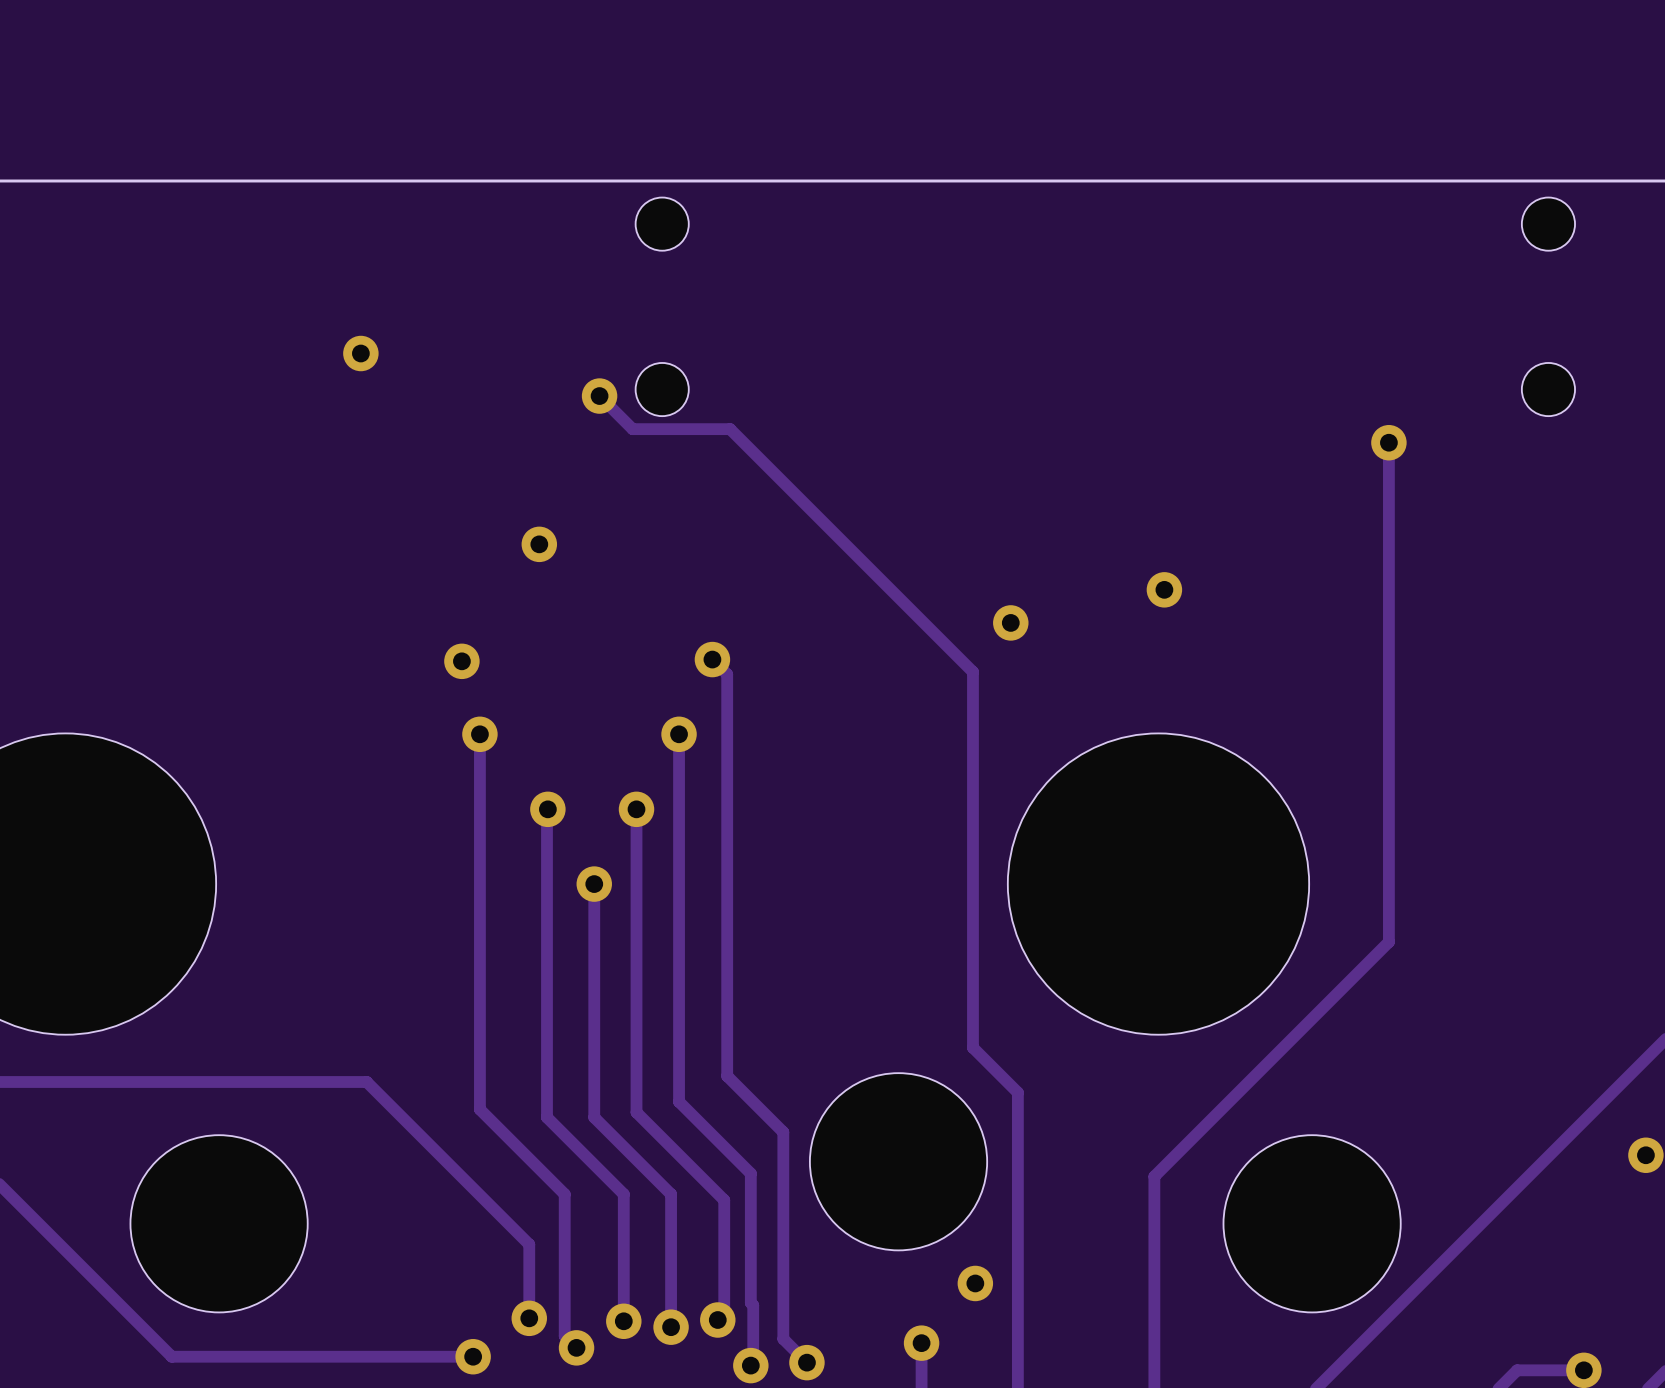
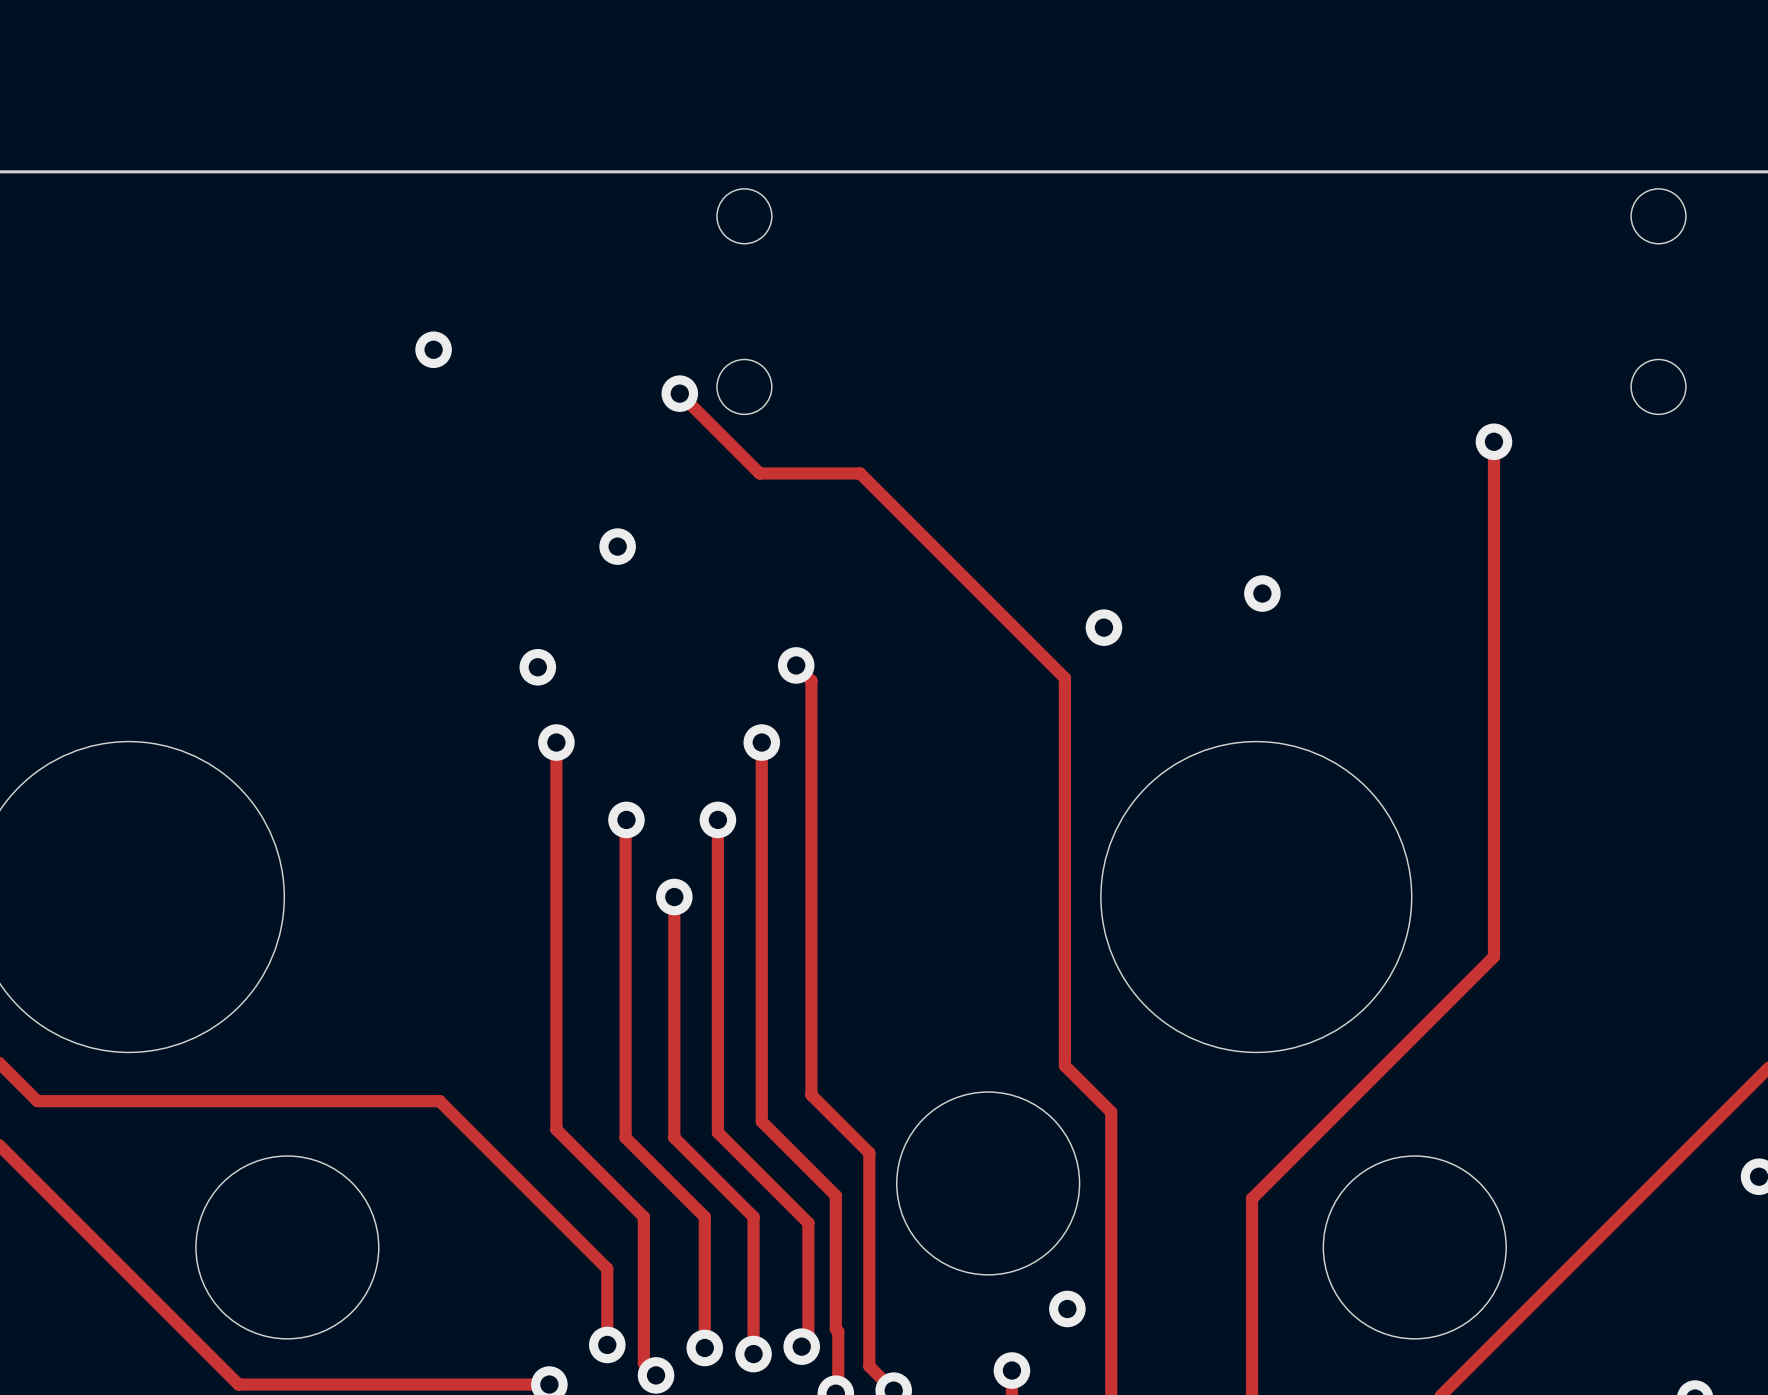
track: (632, 429) (730, 429) (774, 473) -> (713, 427) (759, 473) (860, 473)

